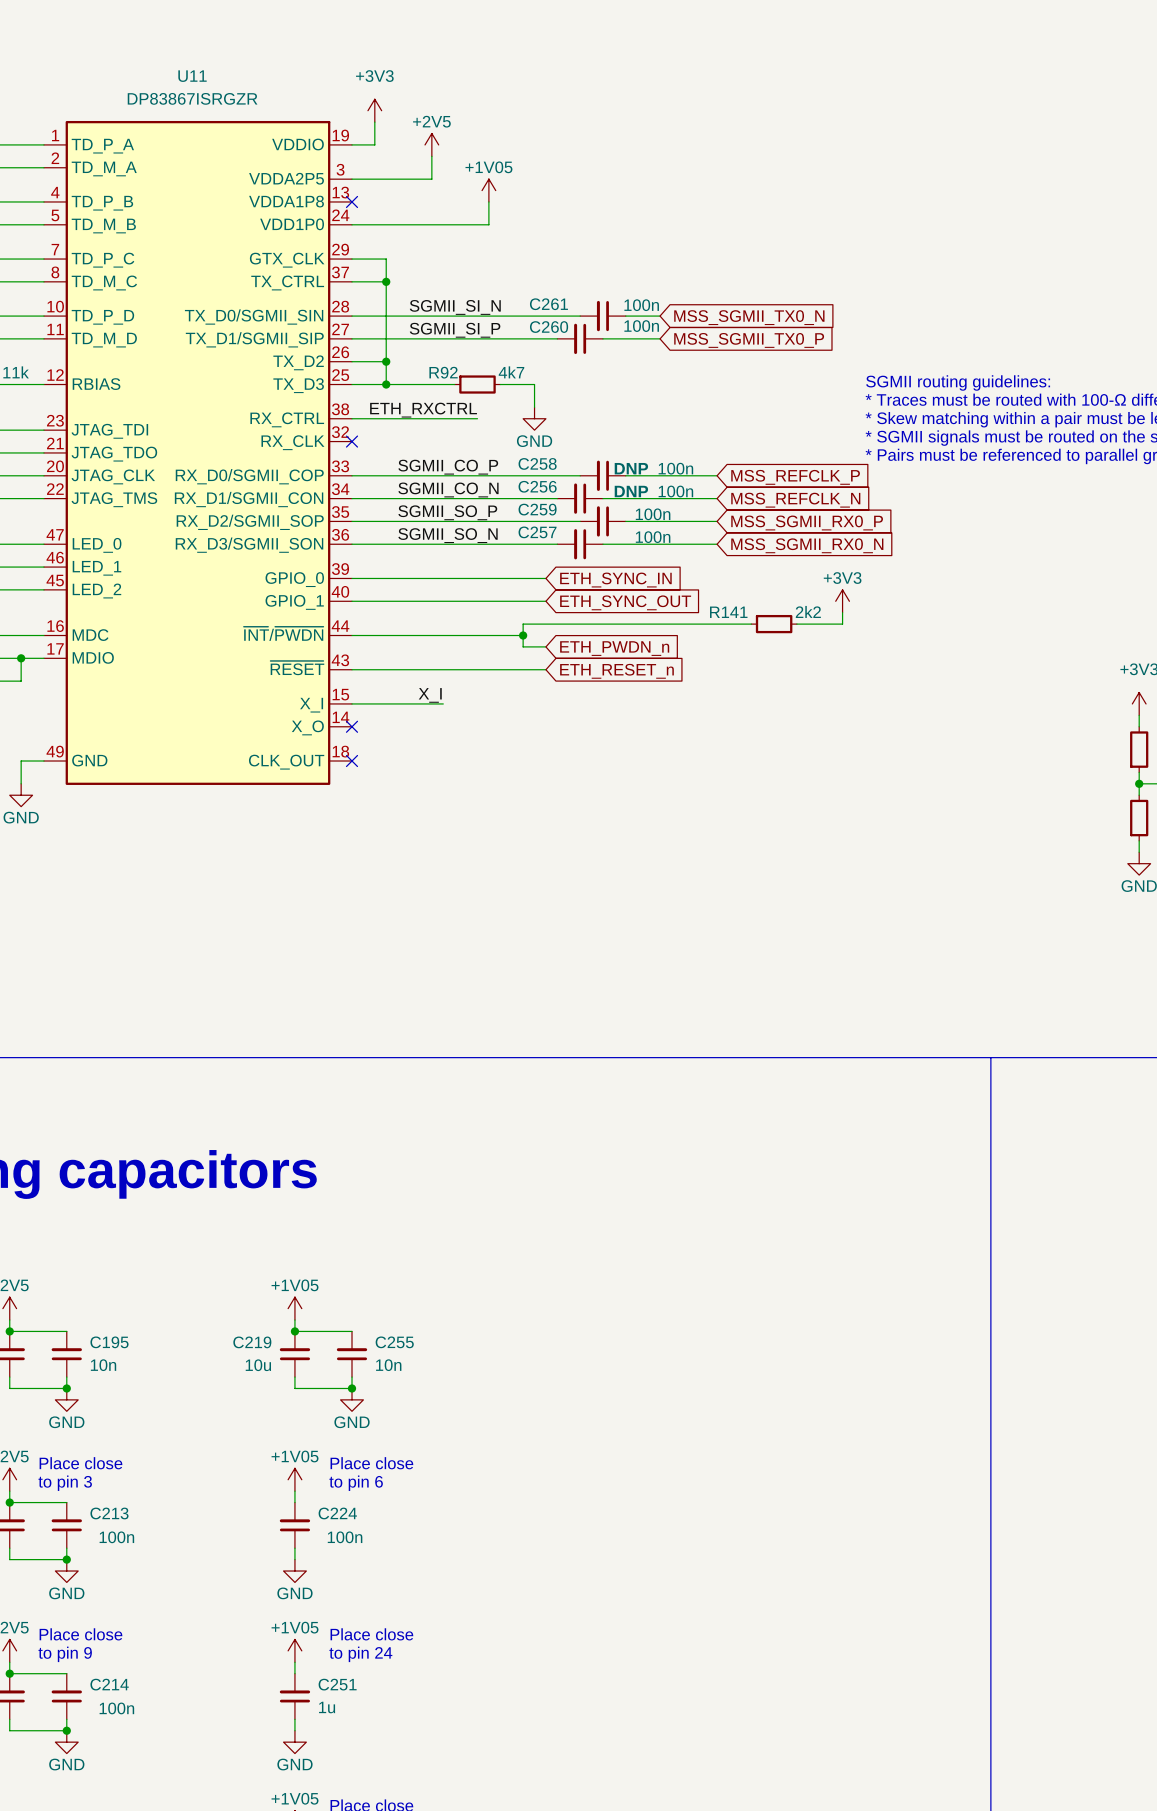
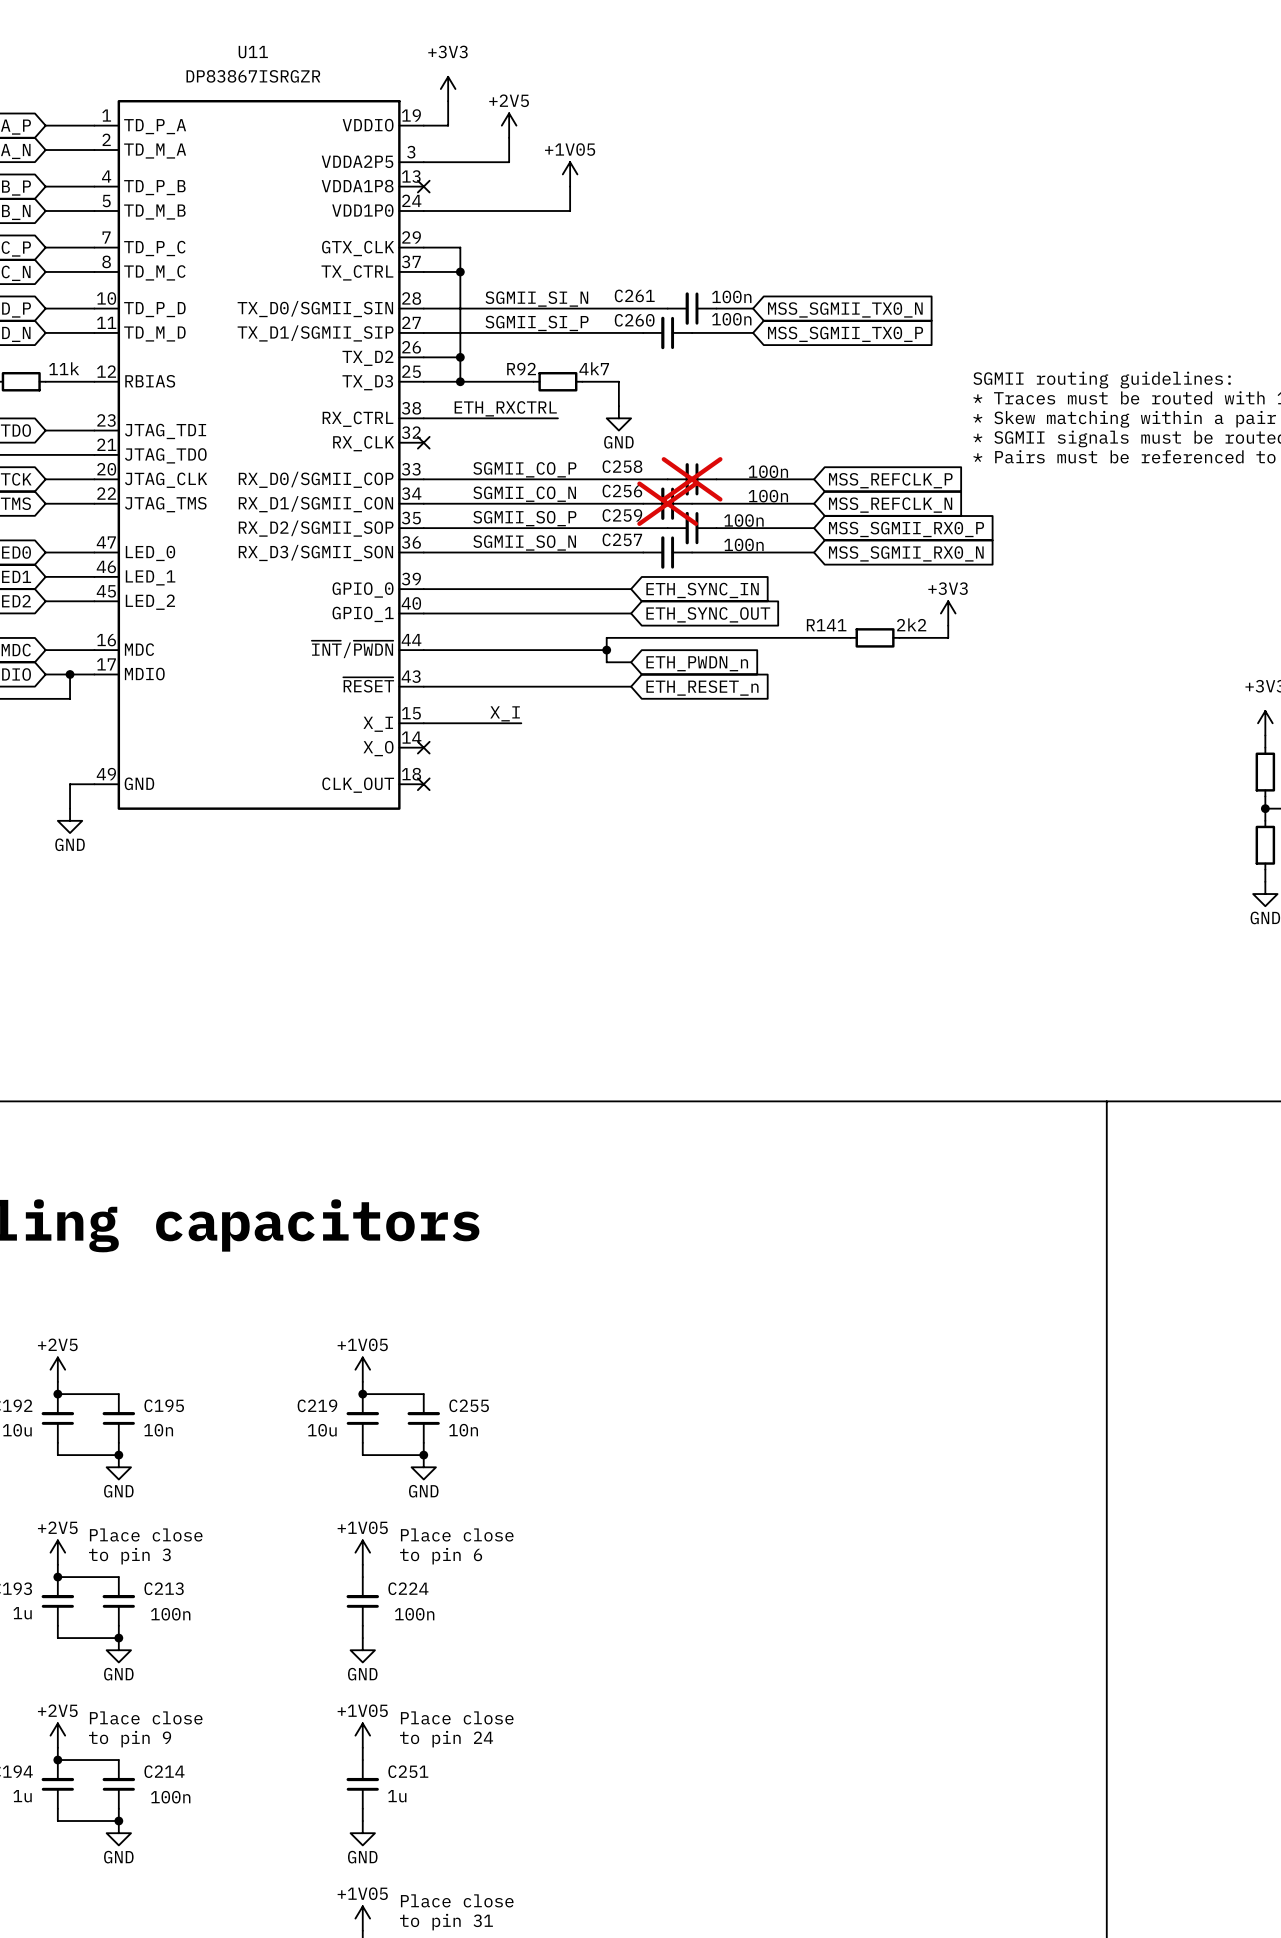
C258 text: DNP (631, 468) -> none
C258 do-not-place cross: none -> (692, 479)
C256 text: DNP (631, 491) -> none
C256 do-not-place cross: none -> (667, 503)

